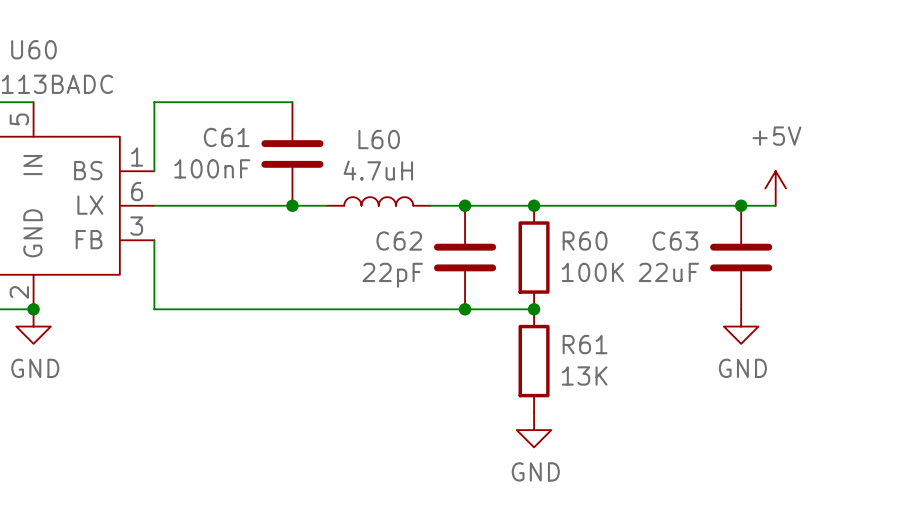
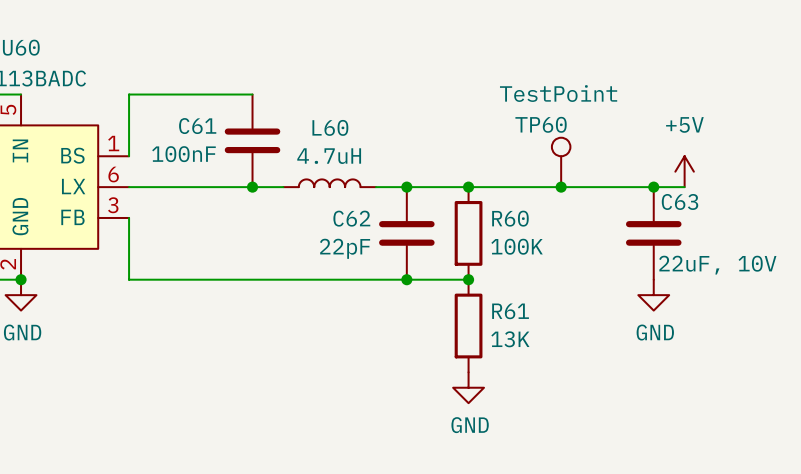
TP60: none -> TestPoint (561, 162)
junction: none -> (561, 187)
C63 name position: C63 (675, 241) -> C63 (680, 201)
C63 value: 22uF (668, 272) -> 22uF, 10V (717, 265)

